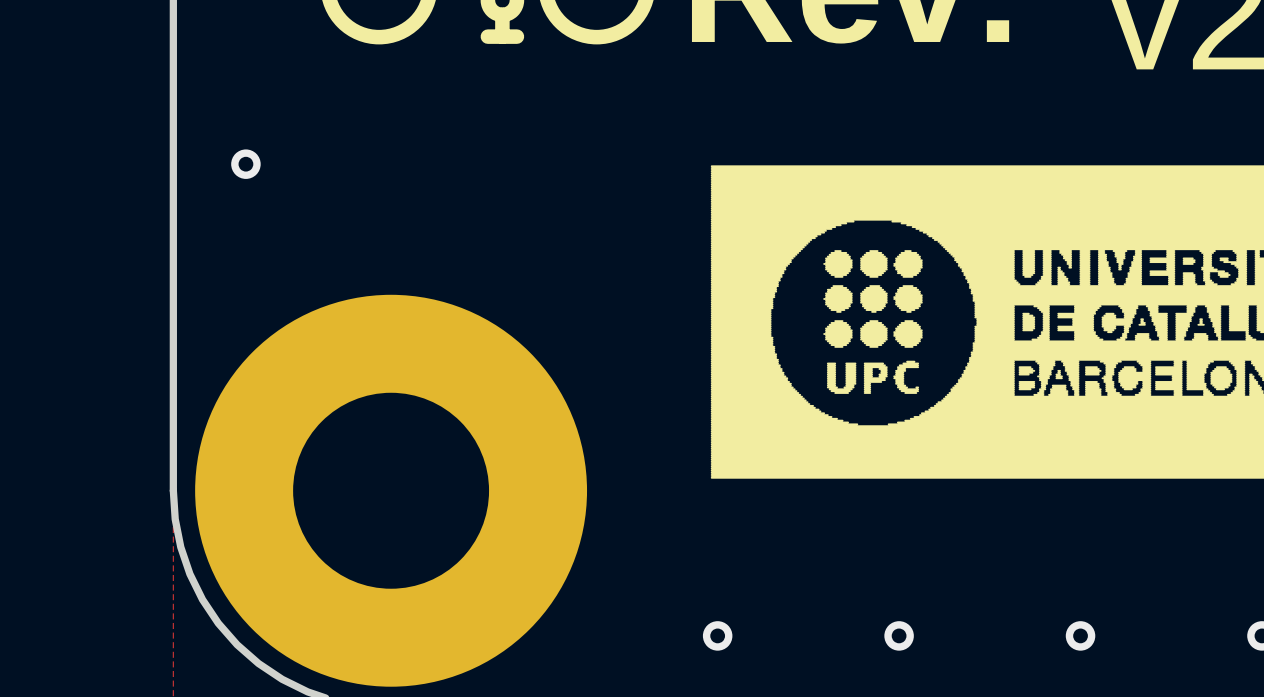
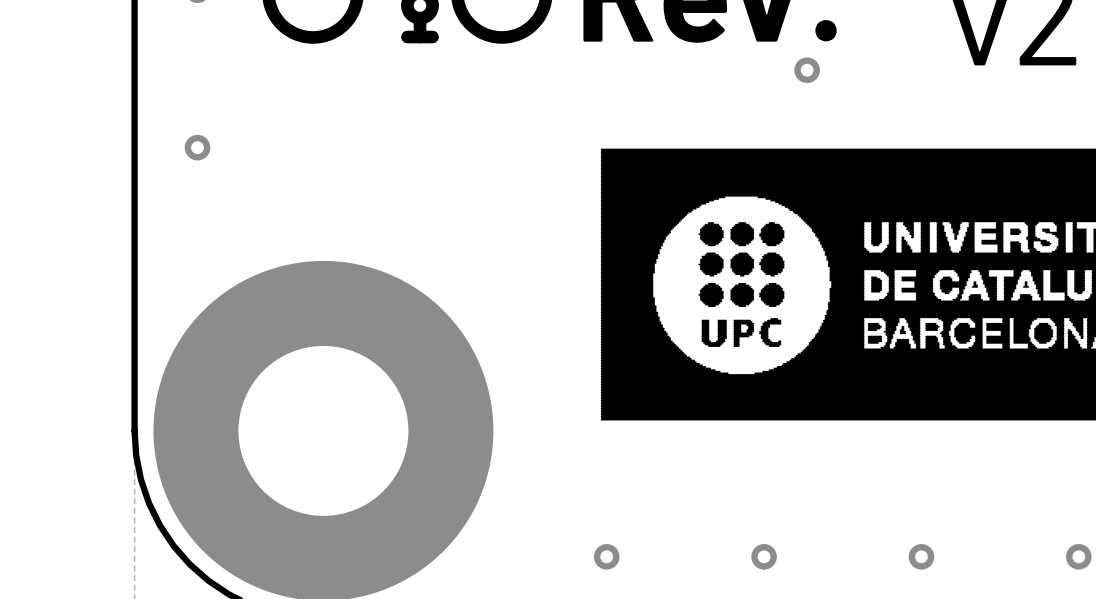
via: none -> (807, 70)

